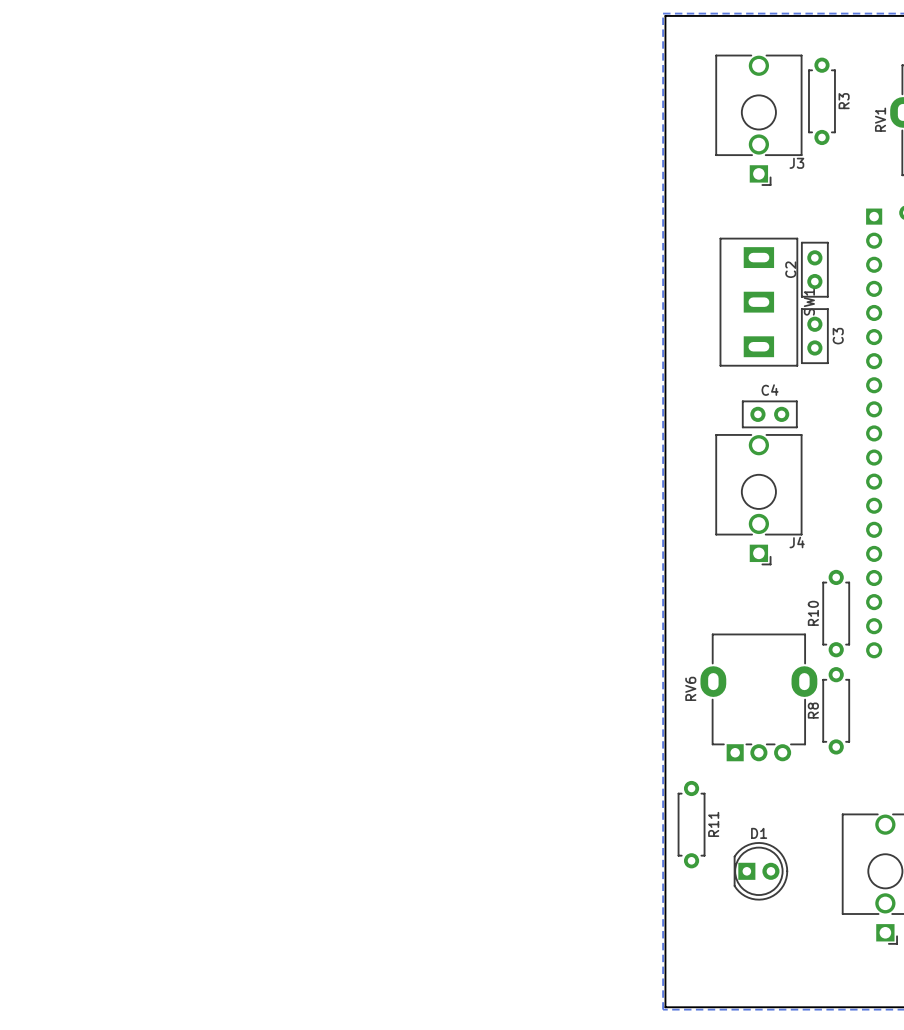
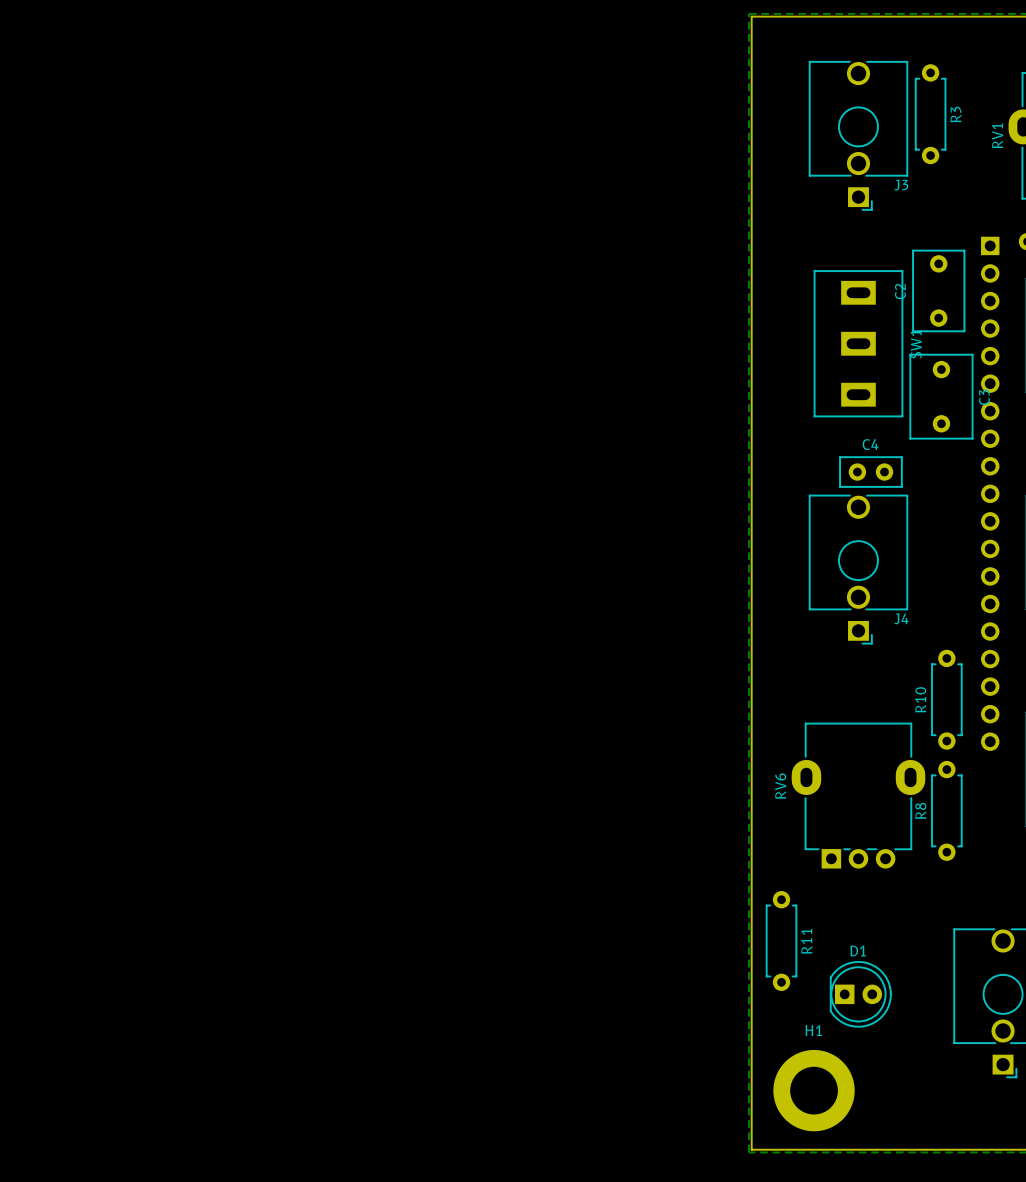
C2 footprint: [801, 242, 829, 298] -> [912, 249, 966, 332]
C3 footprint: [801, 308, 829, 364] -> [909, 354, 974, 440]
H1: none -> (814, 1090)

